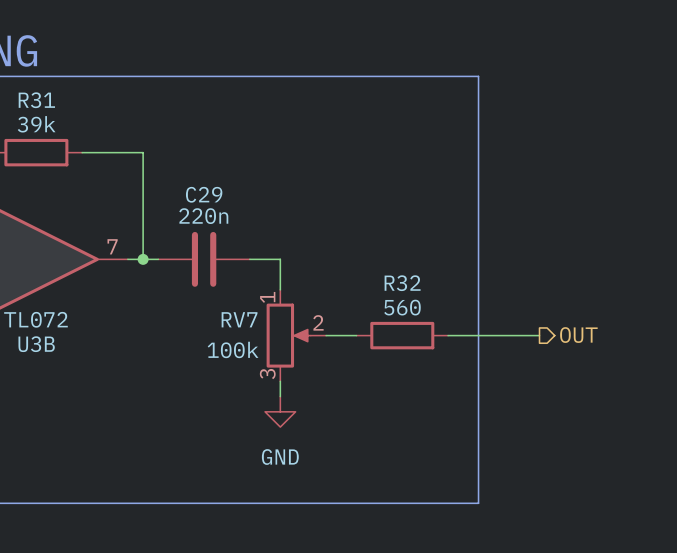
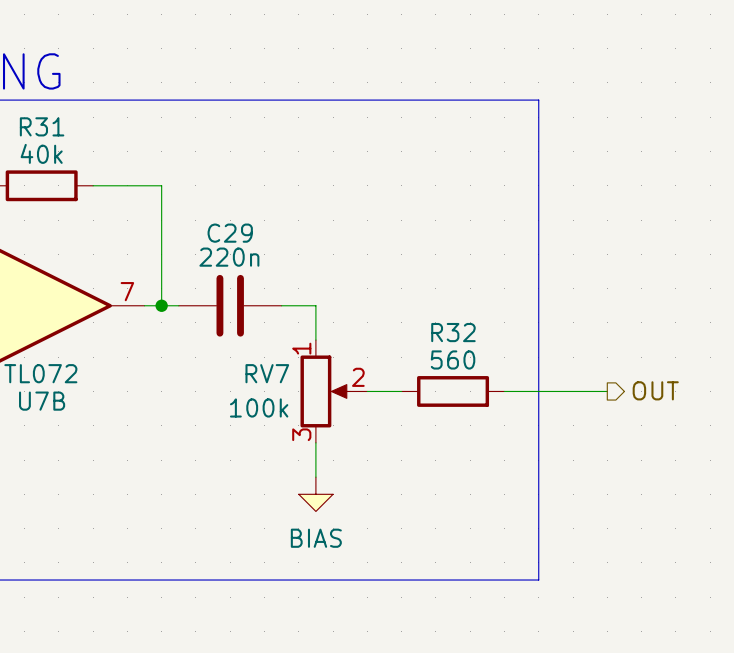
R31 value: 39k (36, 124) -> 40k (41, 153)
U3B name: U3B (36, 344) -> U7B (42, 401)
power symbol: GND (280, 411) -> none
power symbol: none -> BIAS (315, 494)

